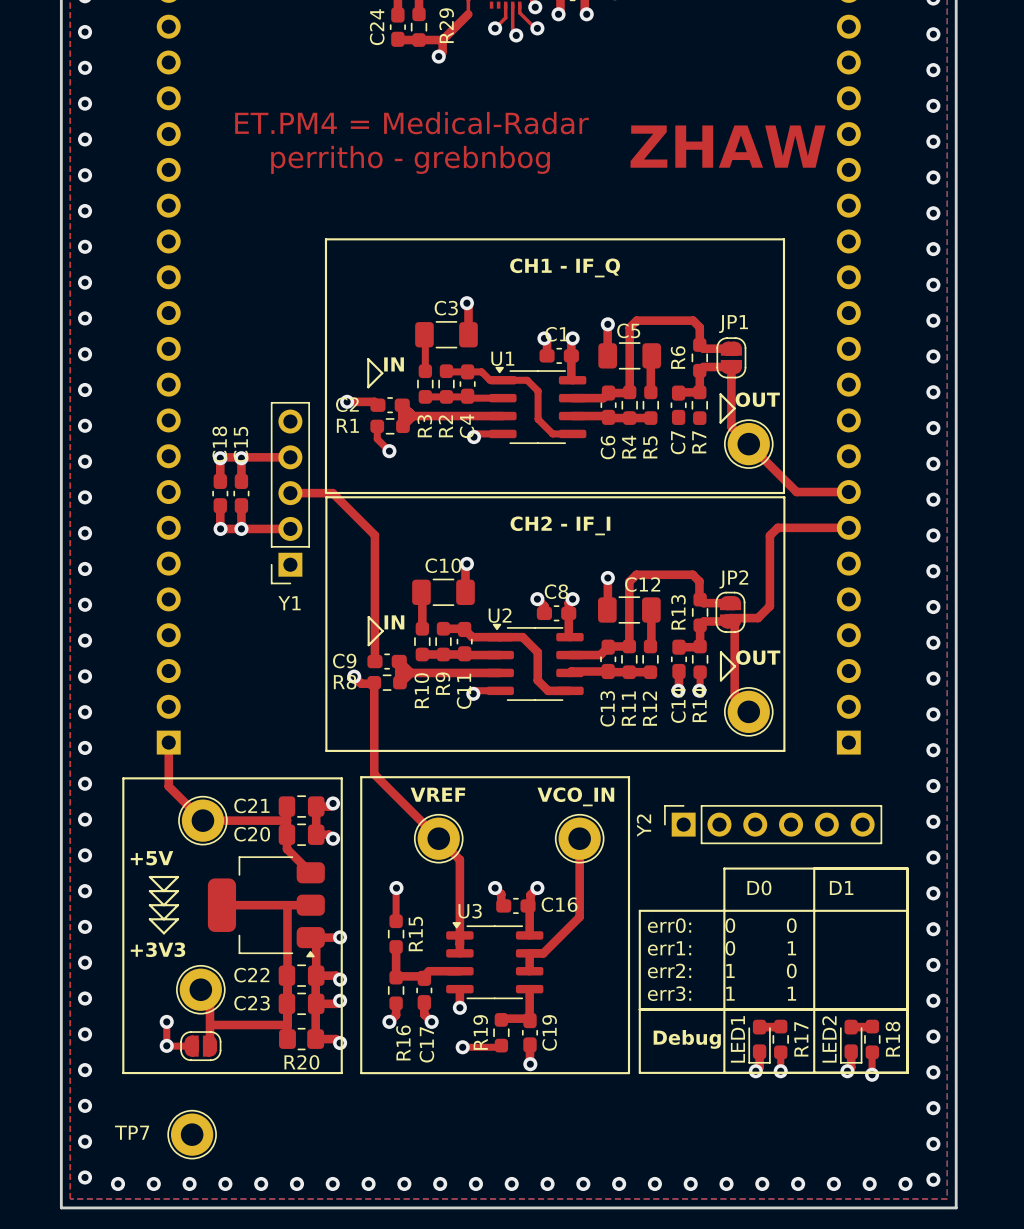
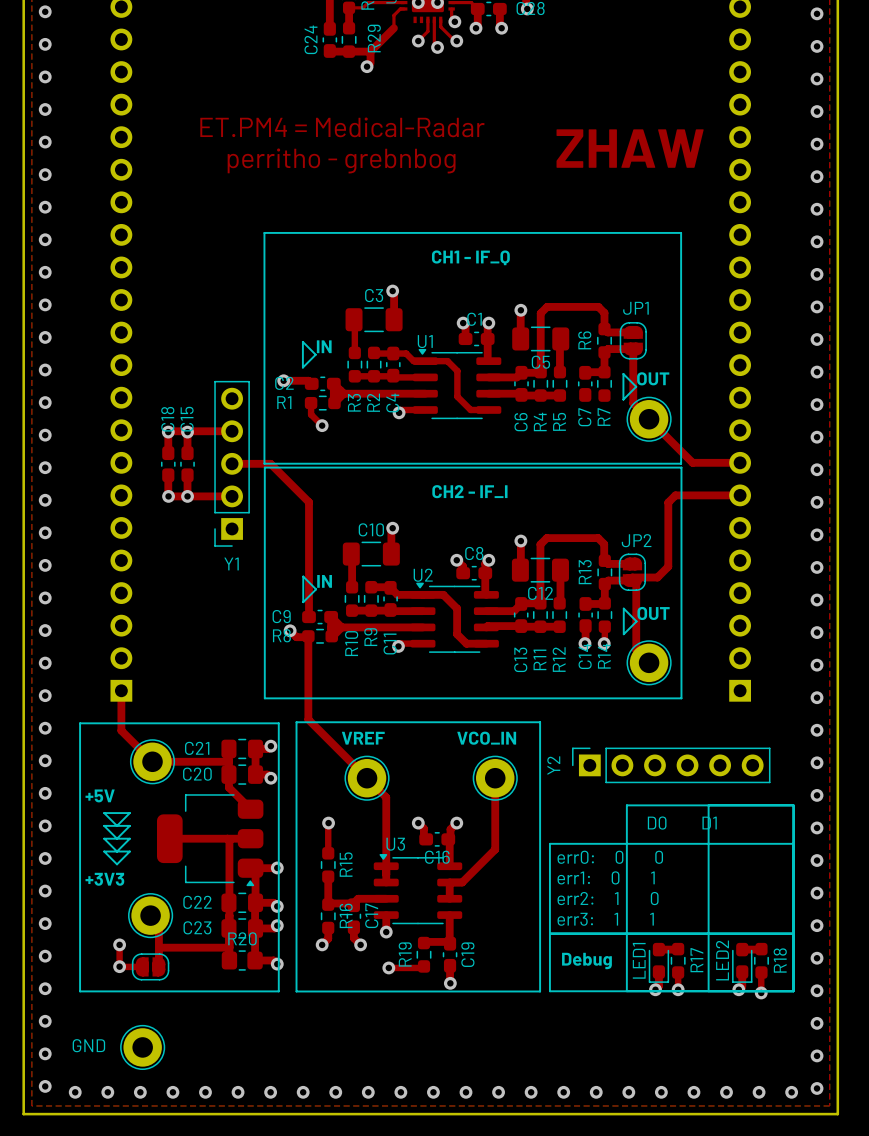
C5 name position: C5 (628, 330) -> C5 (540, 362)
C12 name position: C12 (642, 584) -> C12 (540, 593)
C16 name position: C16 (559, 904) -> C16 (437, 857)
R16 name position: R16 (403, 1042) -> R16 (346, 915)
C17 name position: C17 (426, 1044) -> C17 (371, 915)
R20 name position: R20 (301, 1062) -> R20 (242, 938)
TP7 name: TP7 (132, 1132) -> GND (88, 1045)

